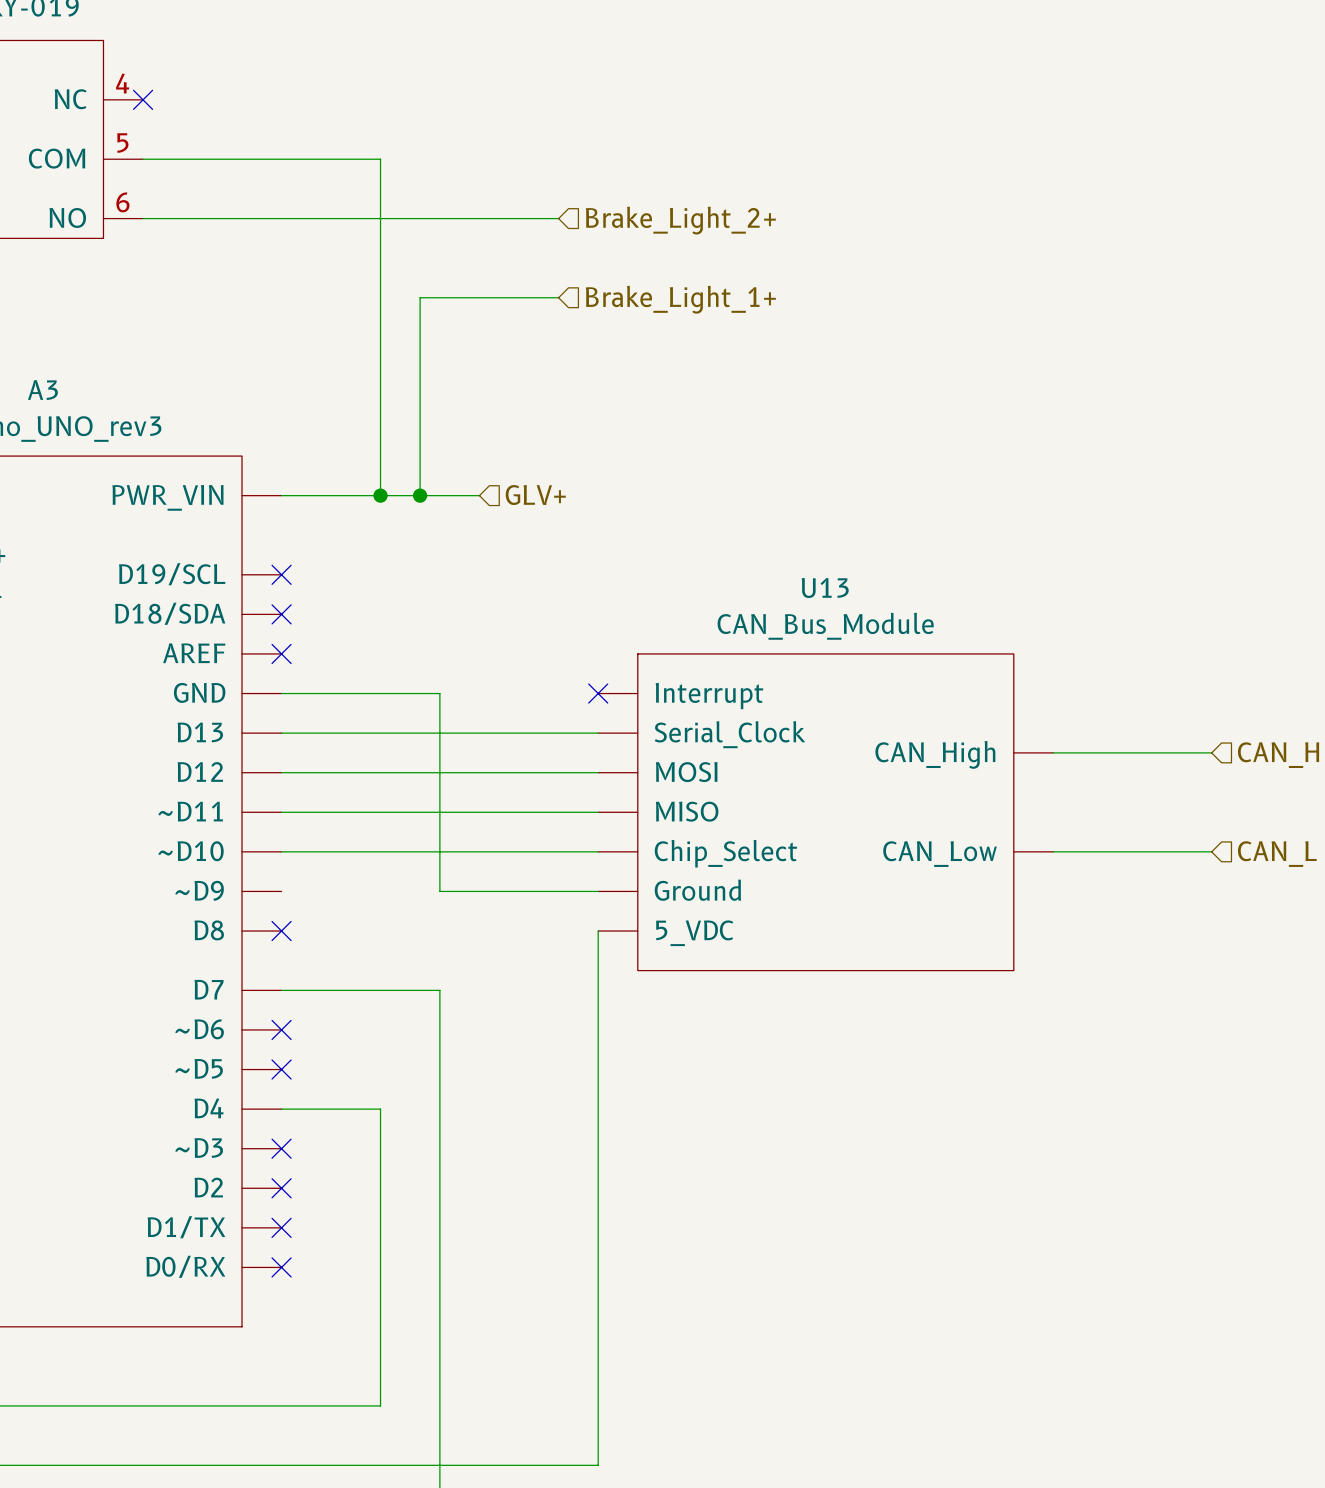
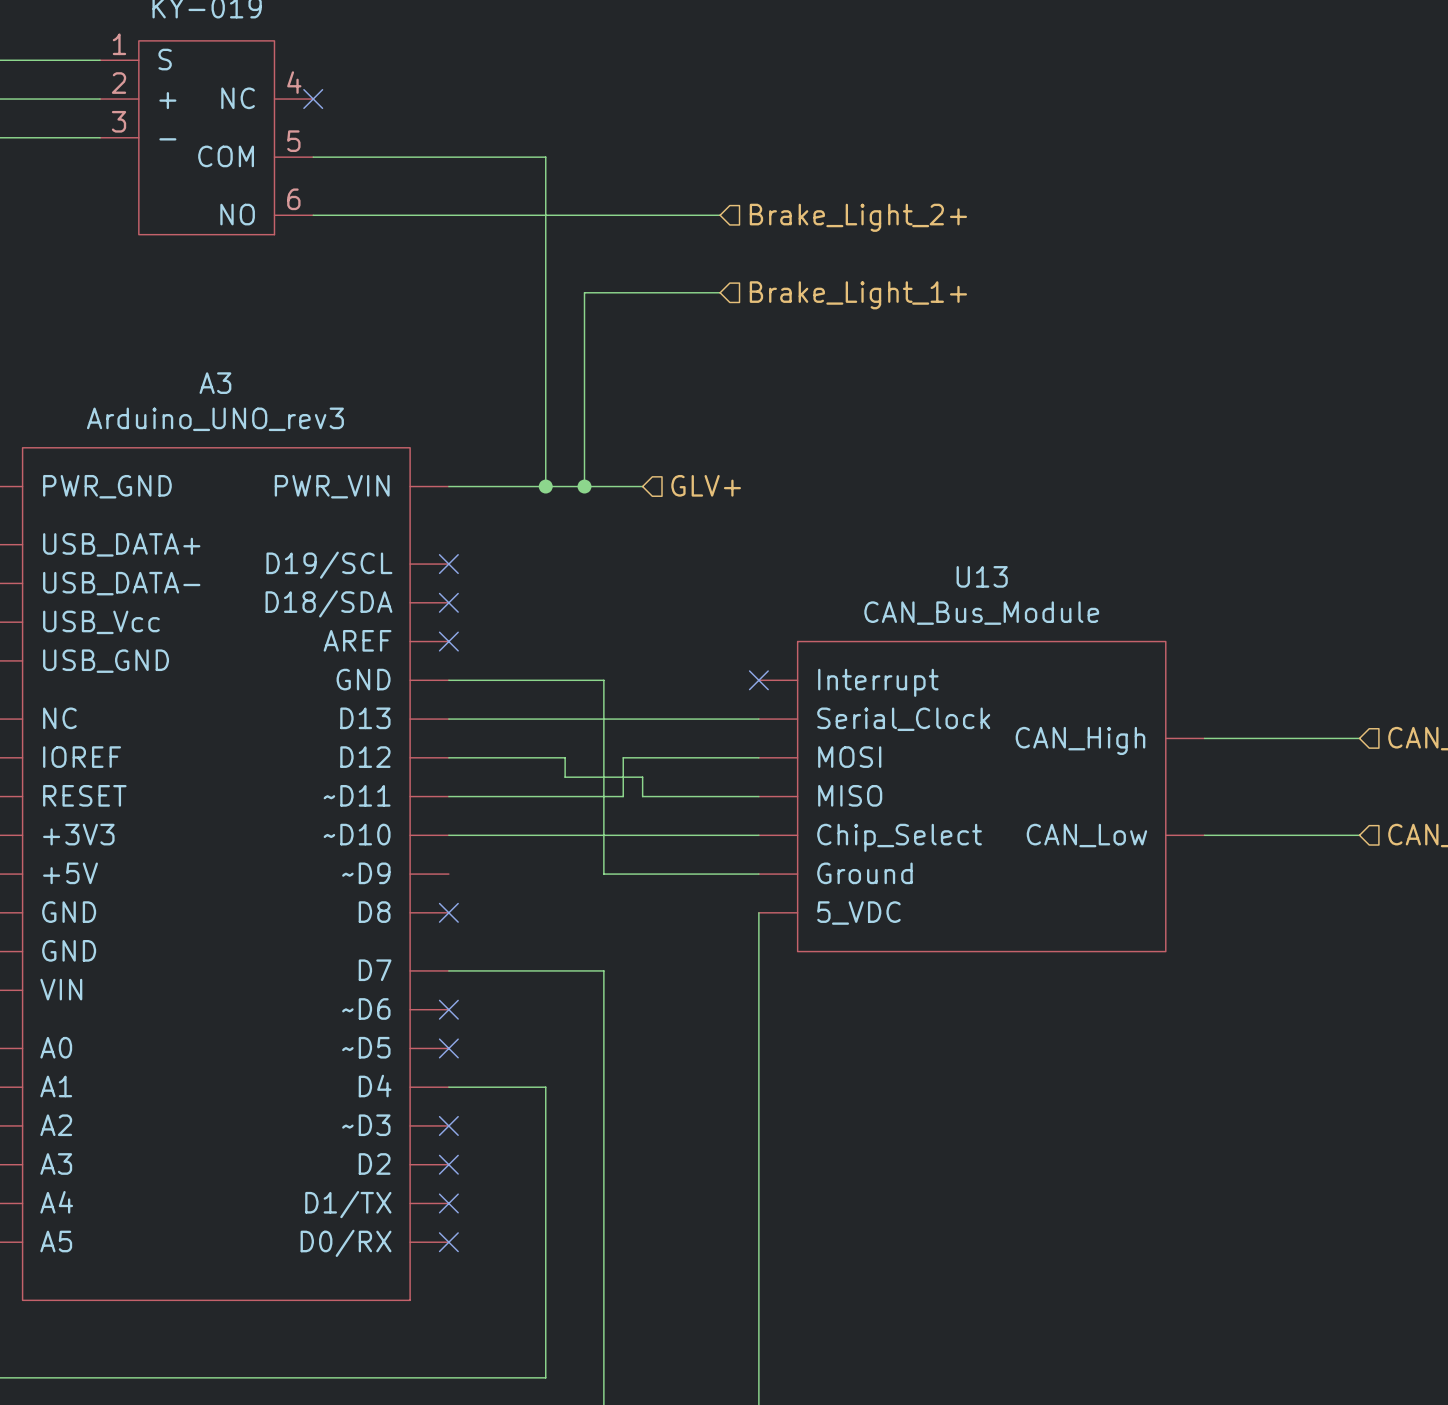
wire: (400, 772) (459, 772) -> (565, 757) (565, 777) (642, 777) (642, 796)
wire: (459, 812) (479, 812) -> (623, 796) (623, 757)

